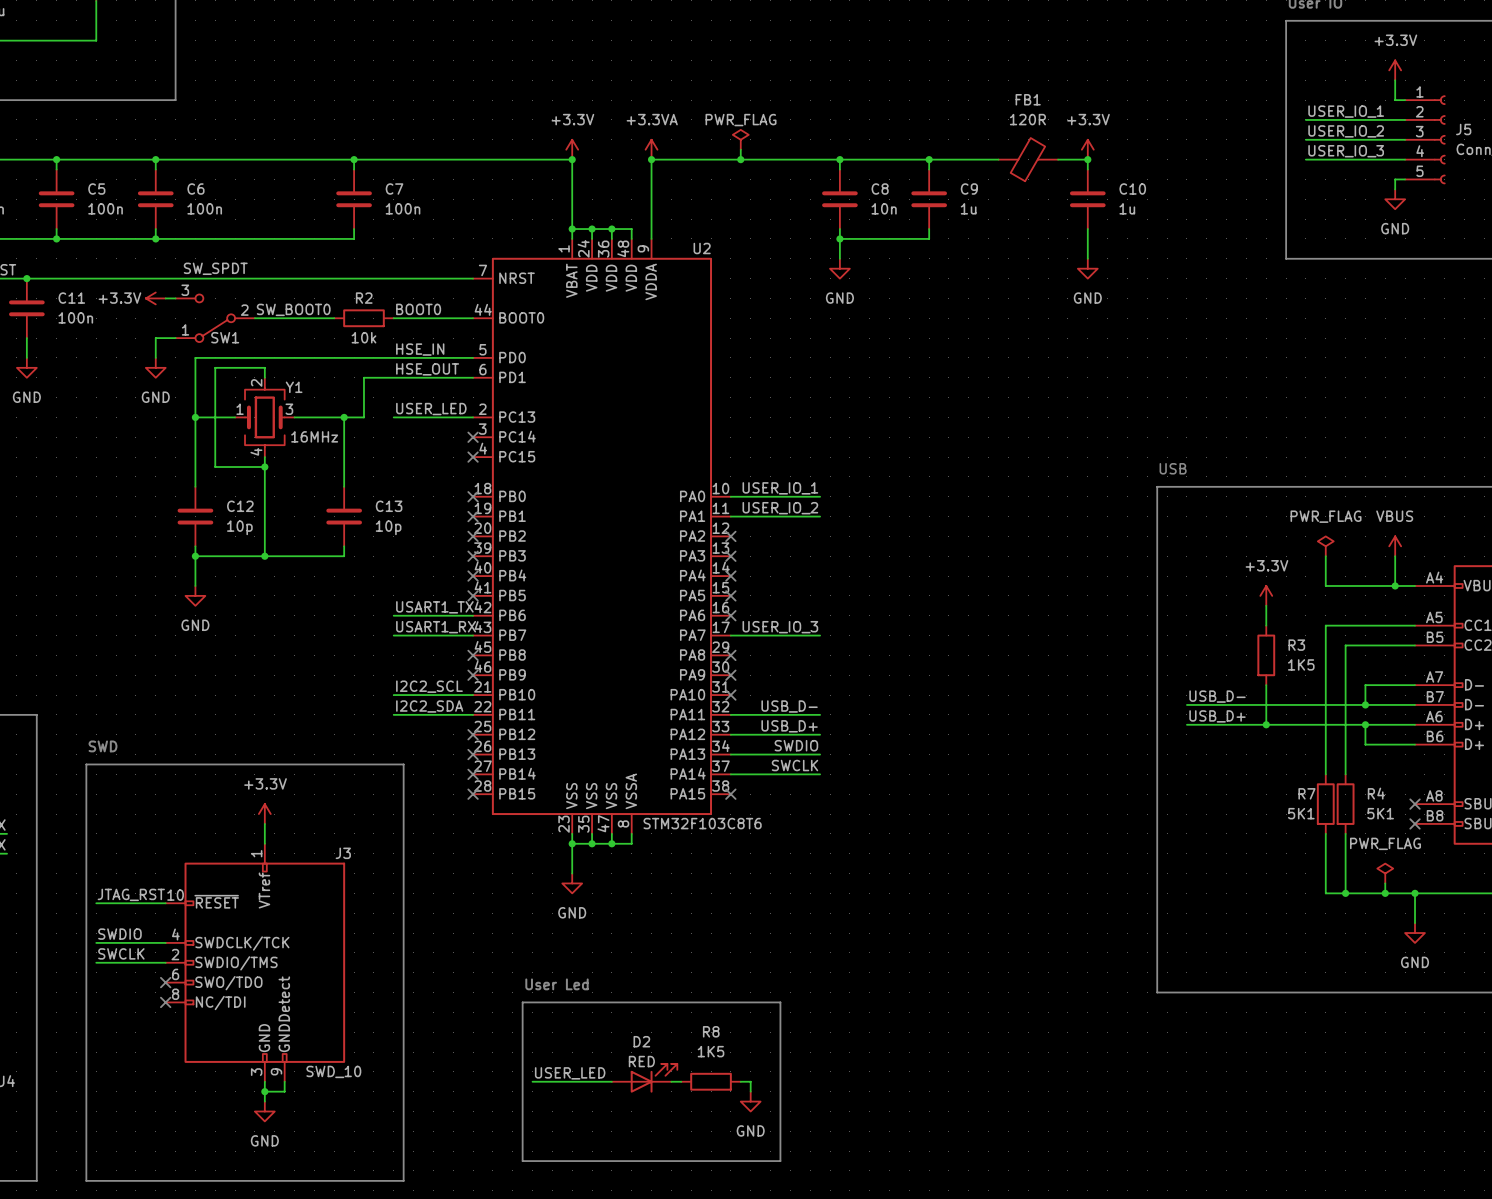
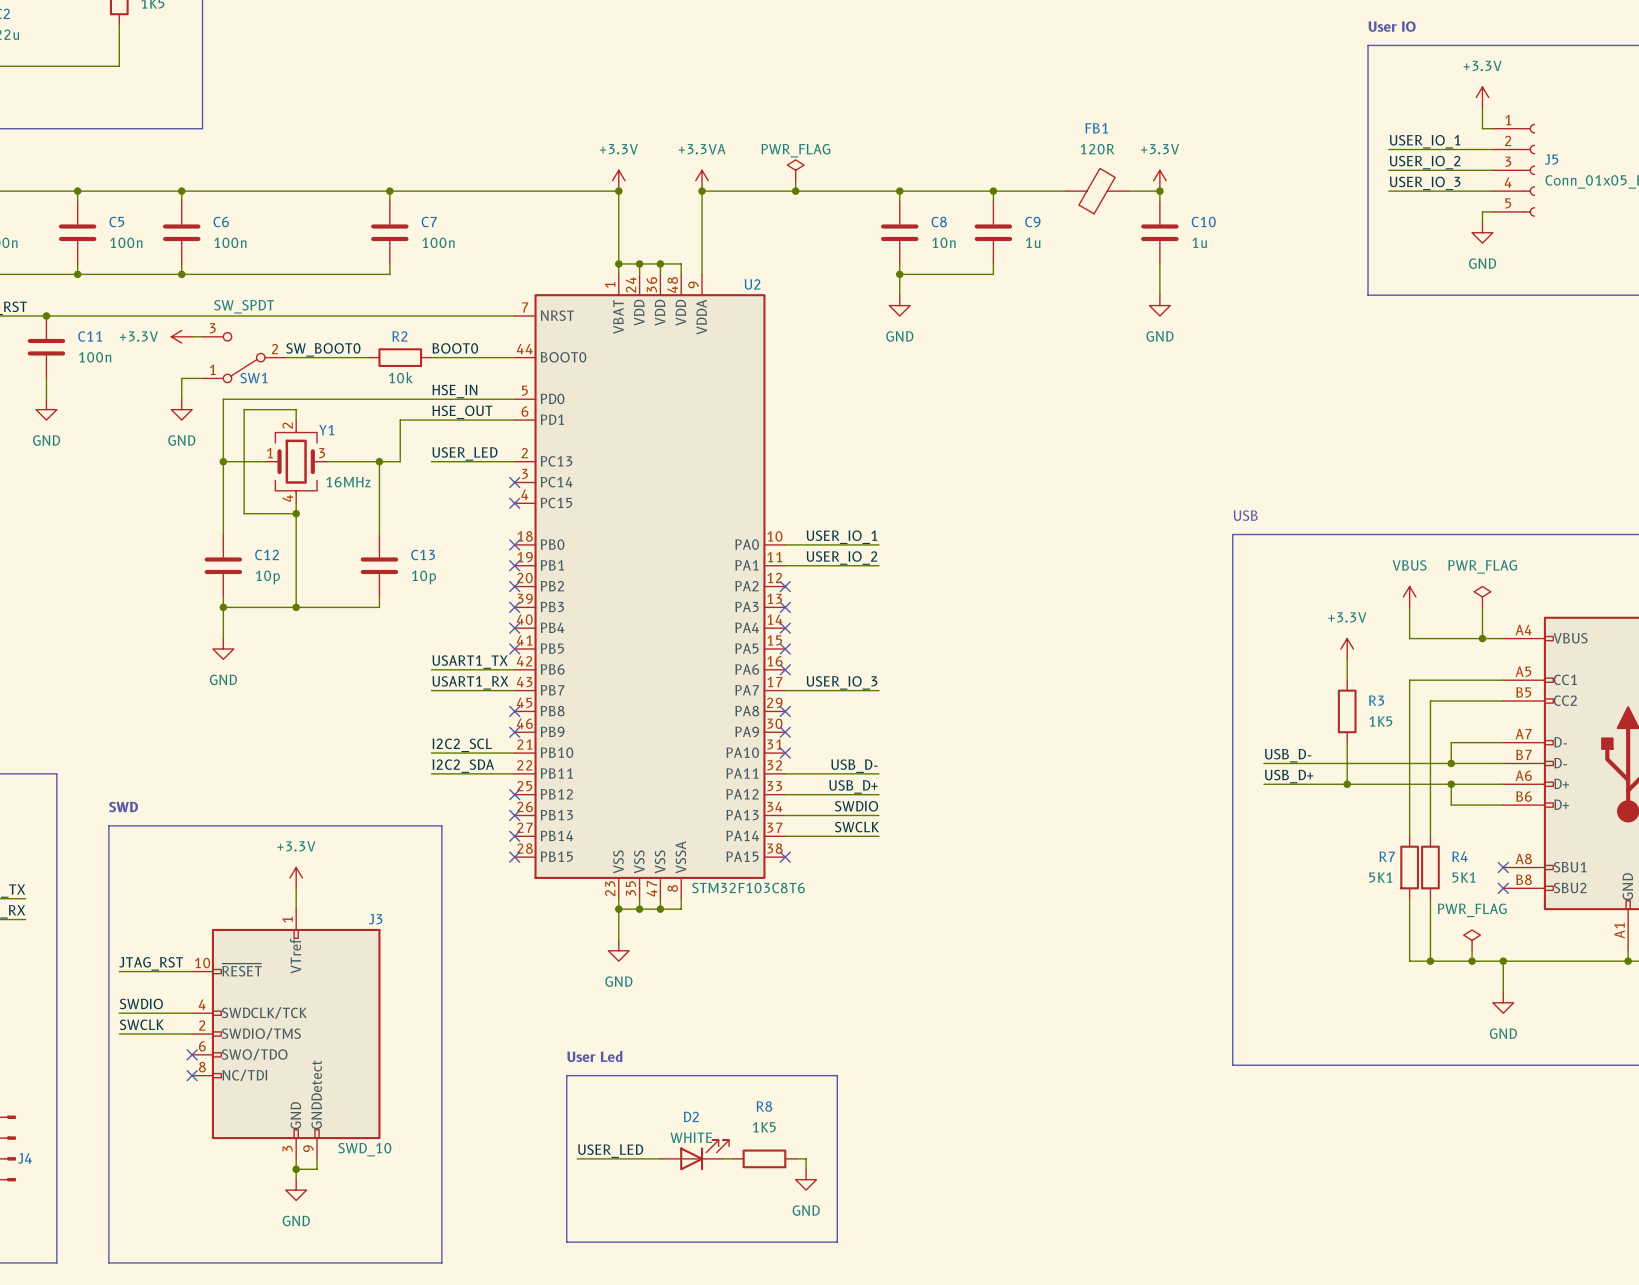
power symbol: PWR_FLAG (1325, 546) -> VBUS (1409, 596)
power symbol: VBUS (1395, 546) -> PWR_FLAG (1482, 596)
D2 value: RED (641, 1061) -> WHITE (691, 1137)

